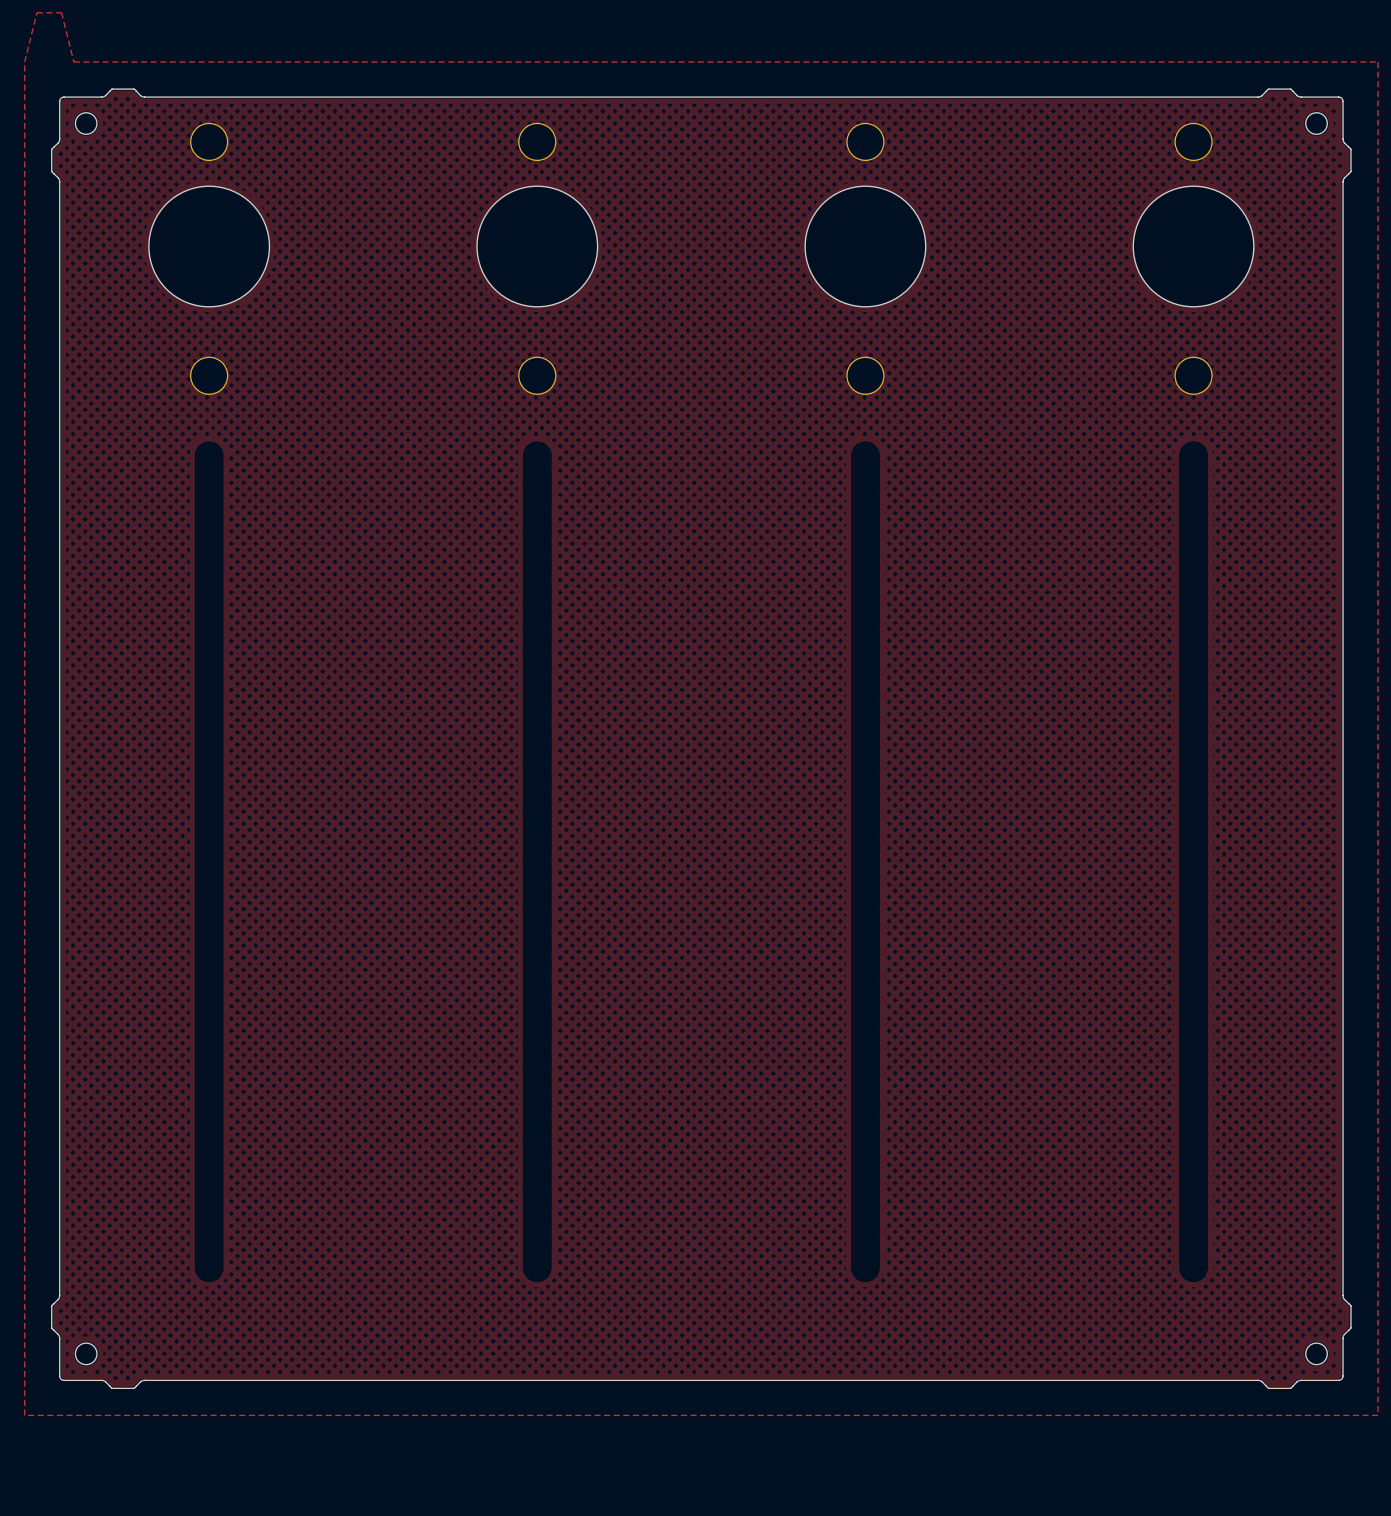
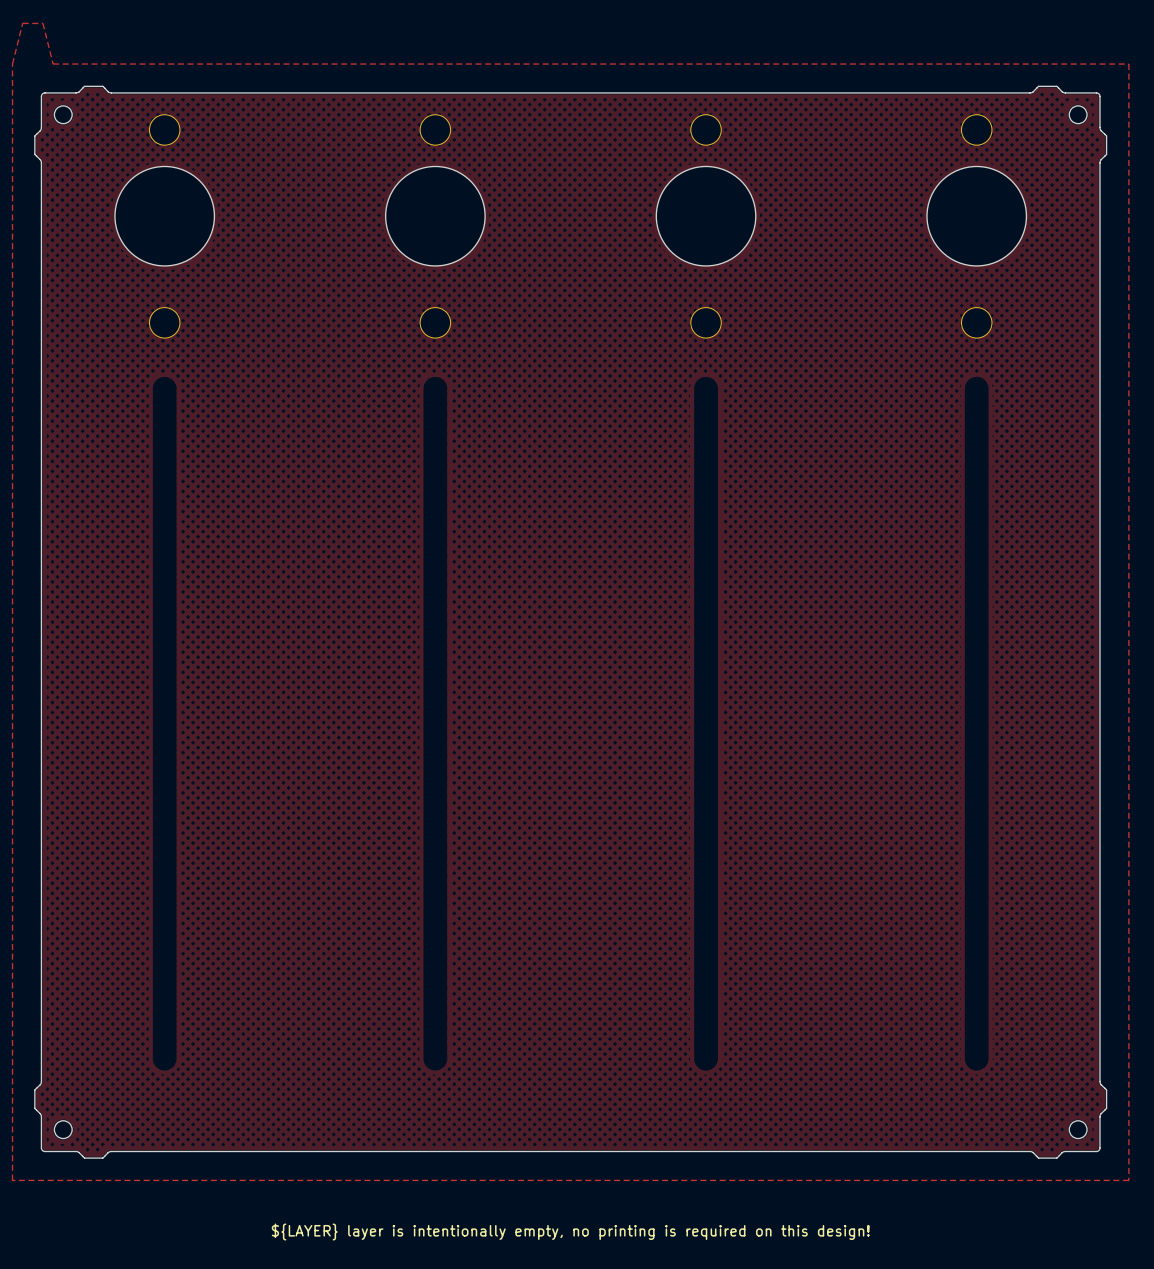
text: none -> ${LAYER} layer is intentionally empty, no printing is required on this design! (570, 1231)

